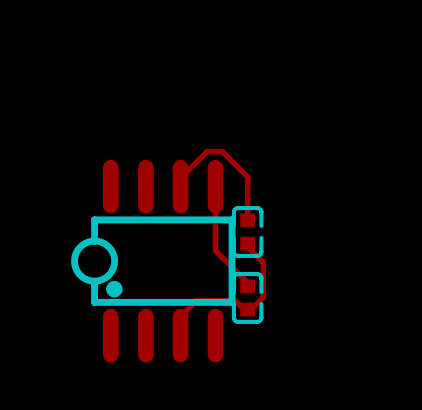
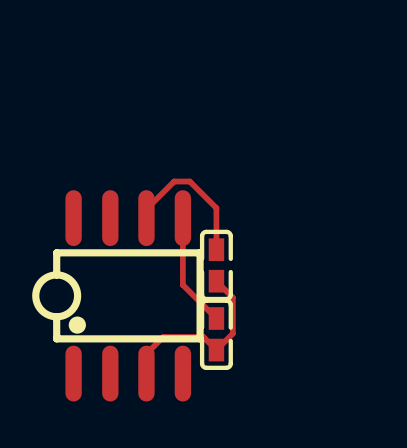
part footprint: [231, 206, 264, 258] -> [199, 229, 233, 302]
part footprint: [231, 271, 264, 324] -> [199, 298, 233, 370]

